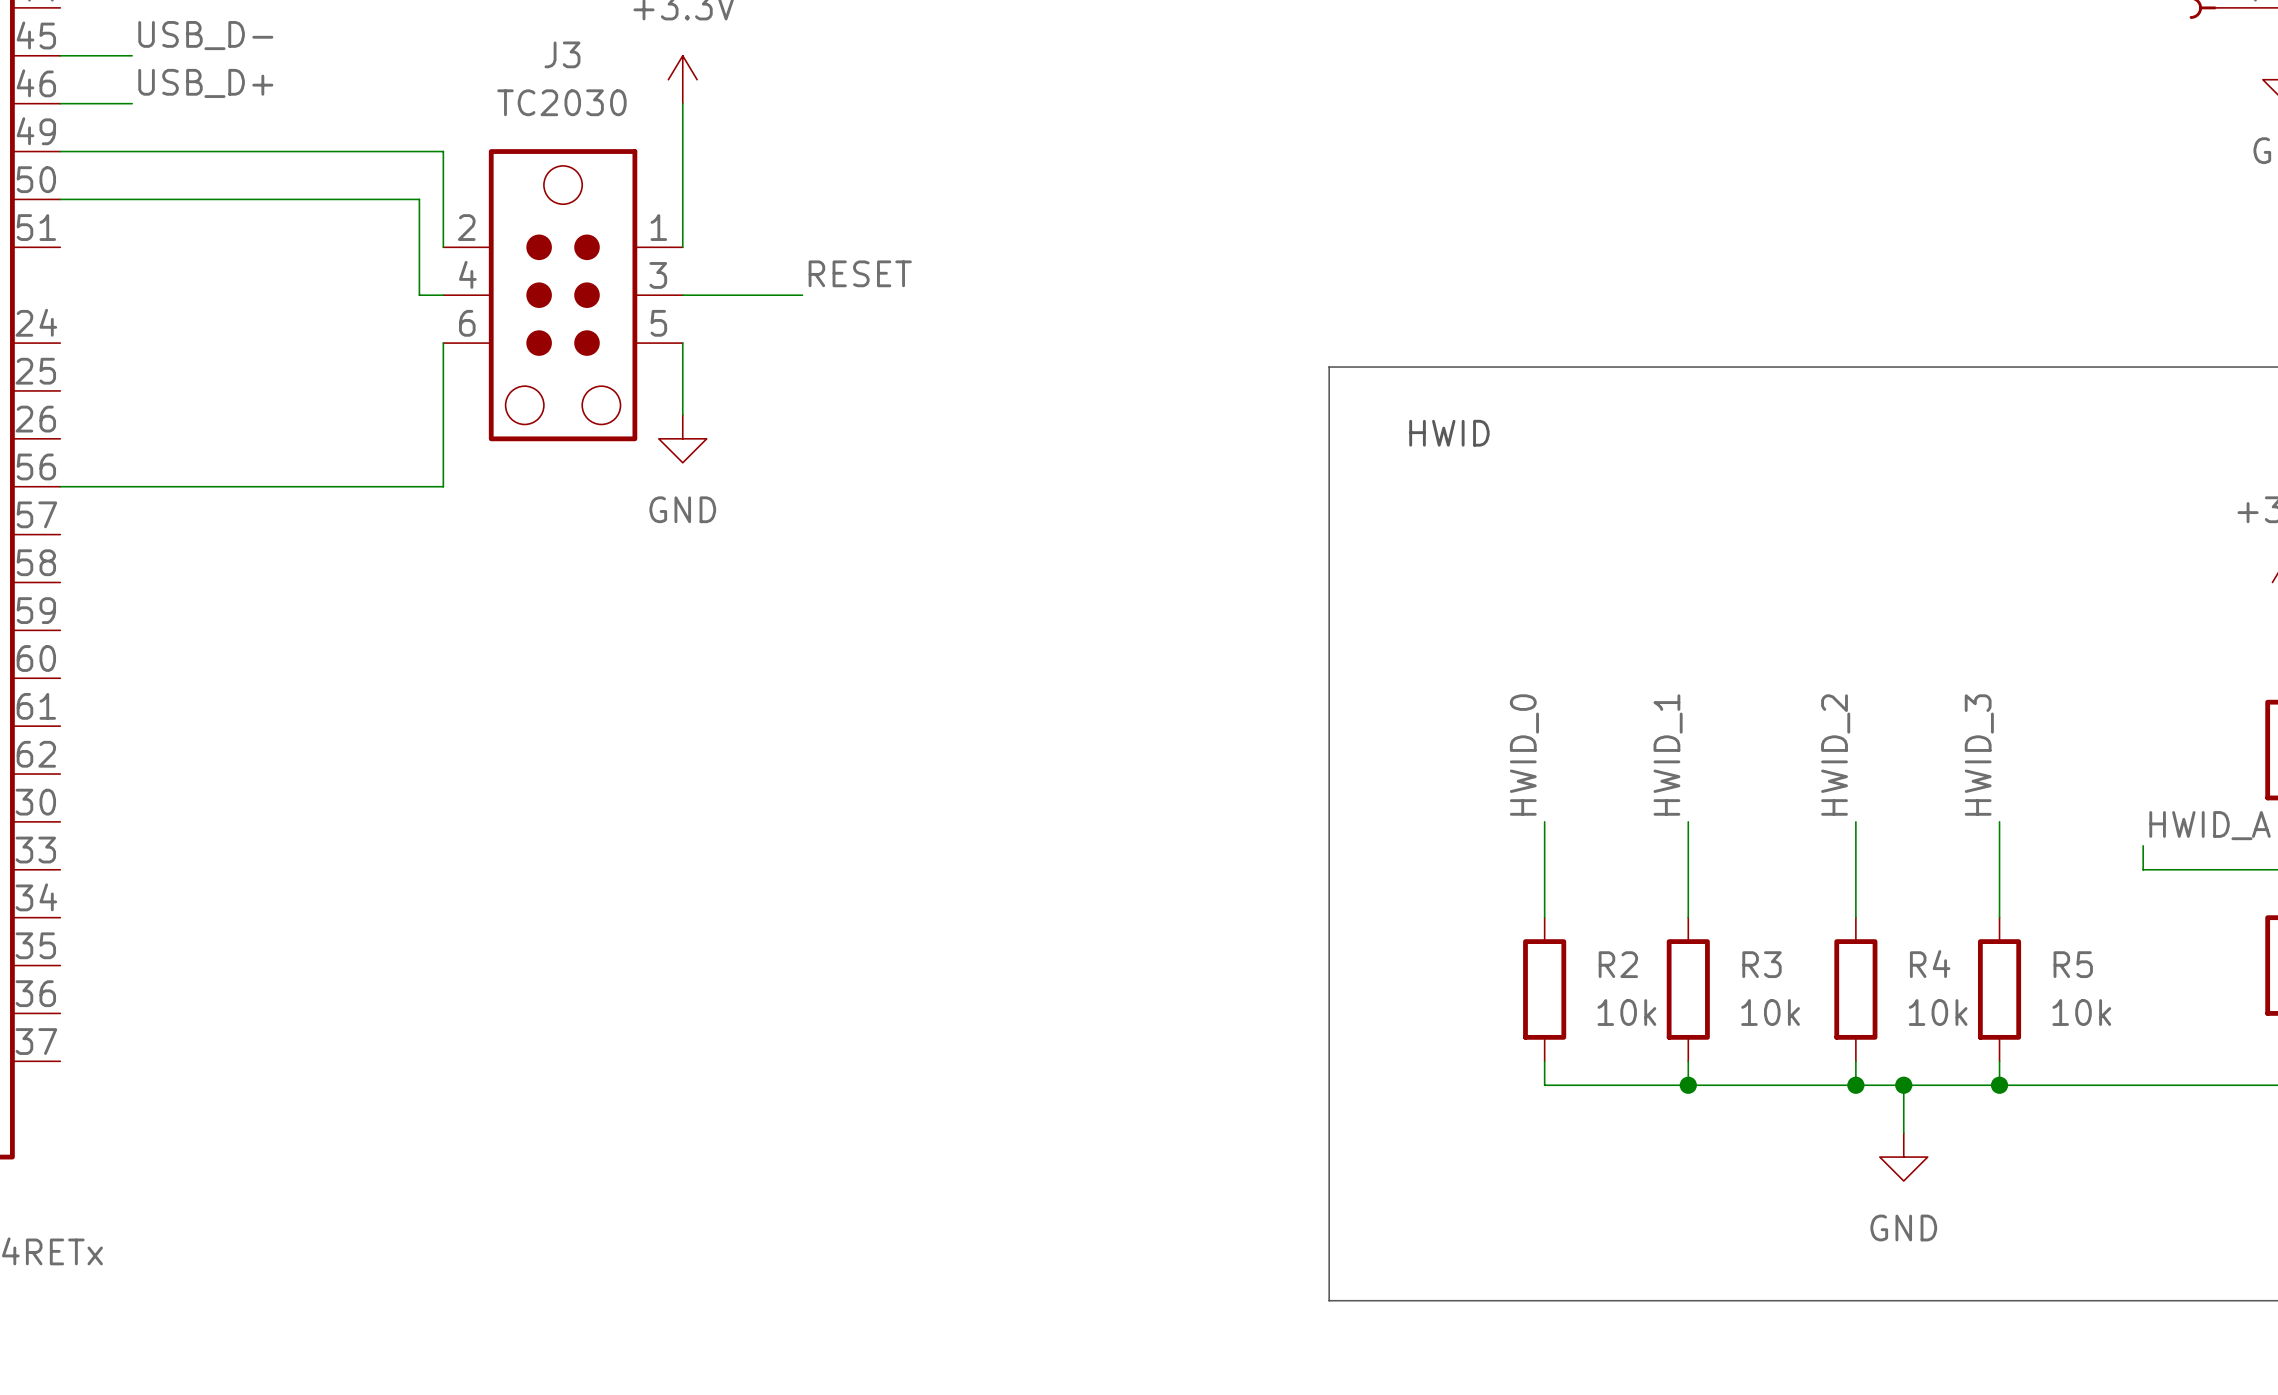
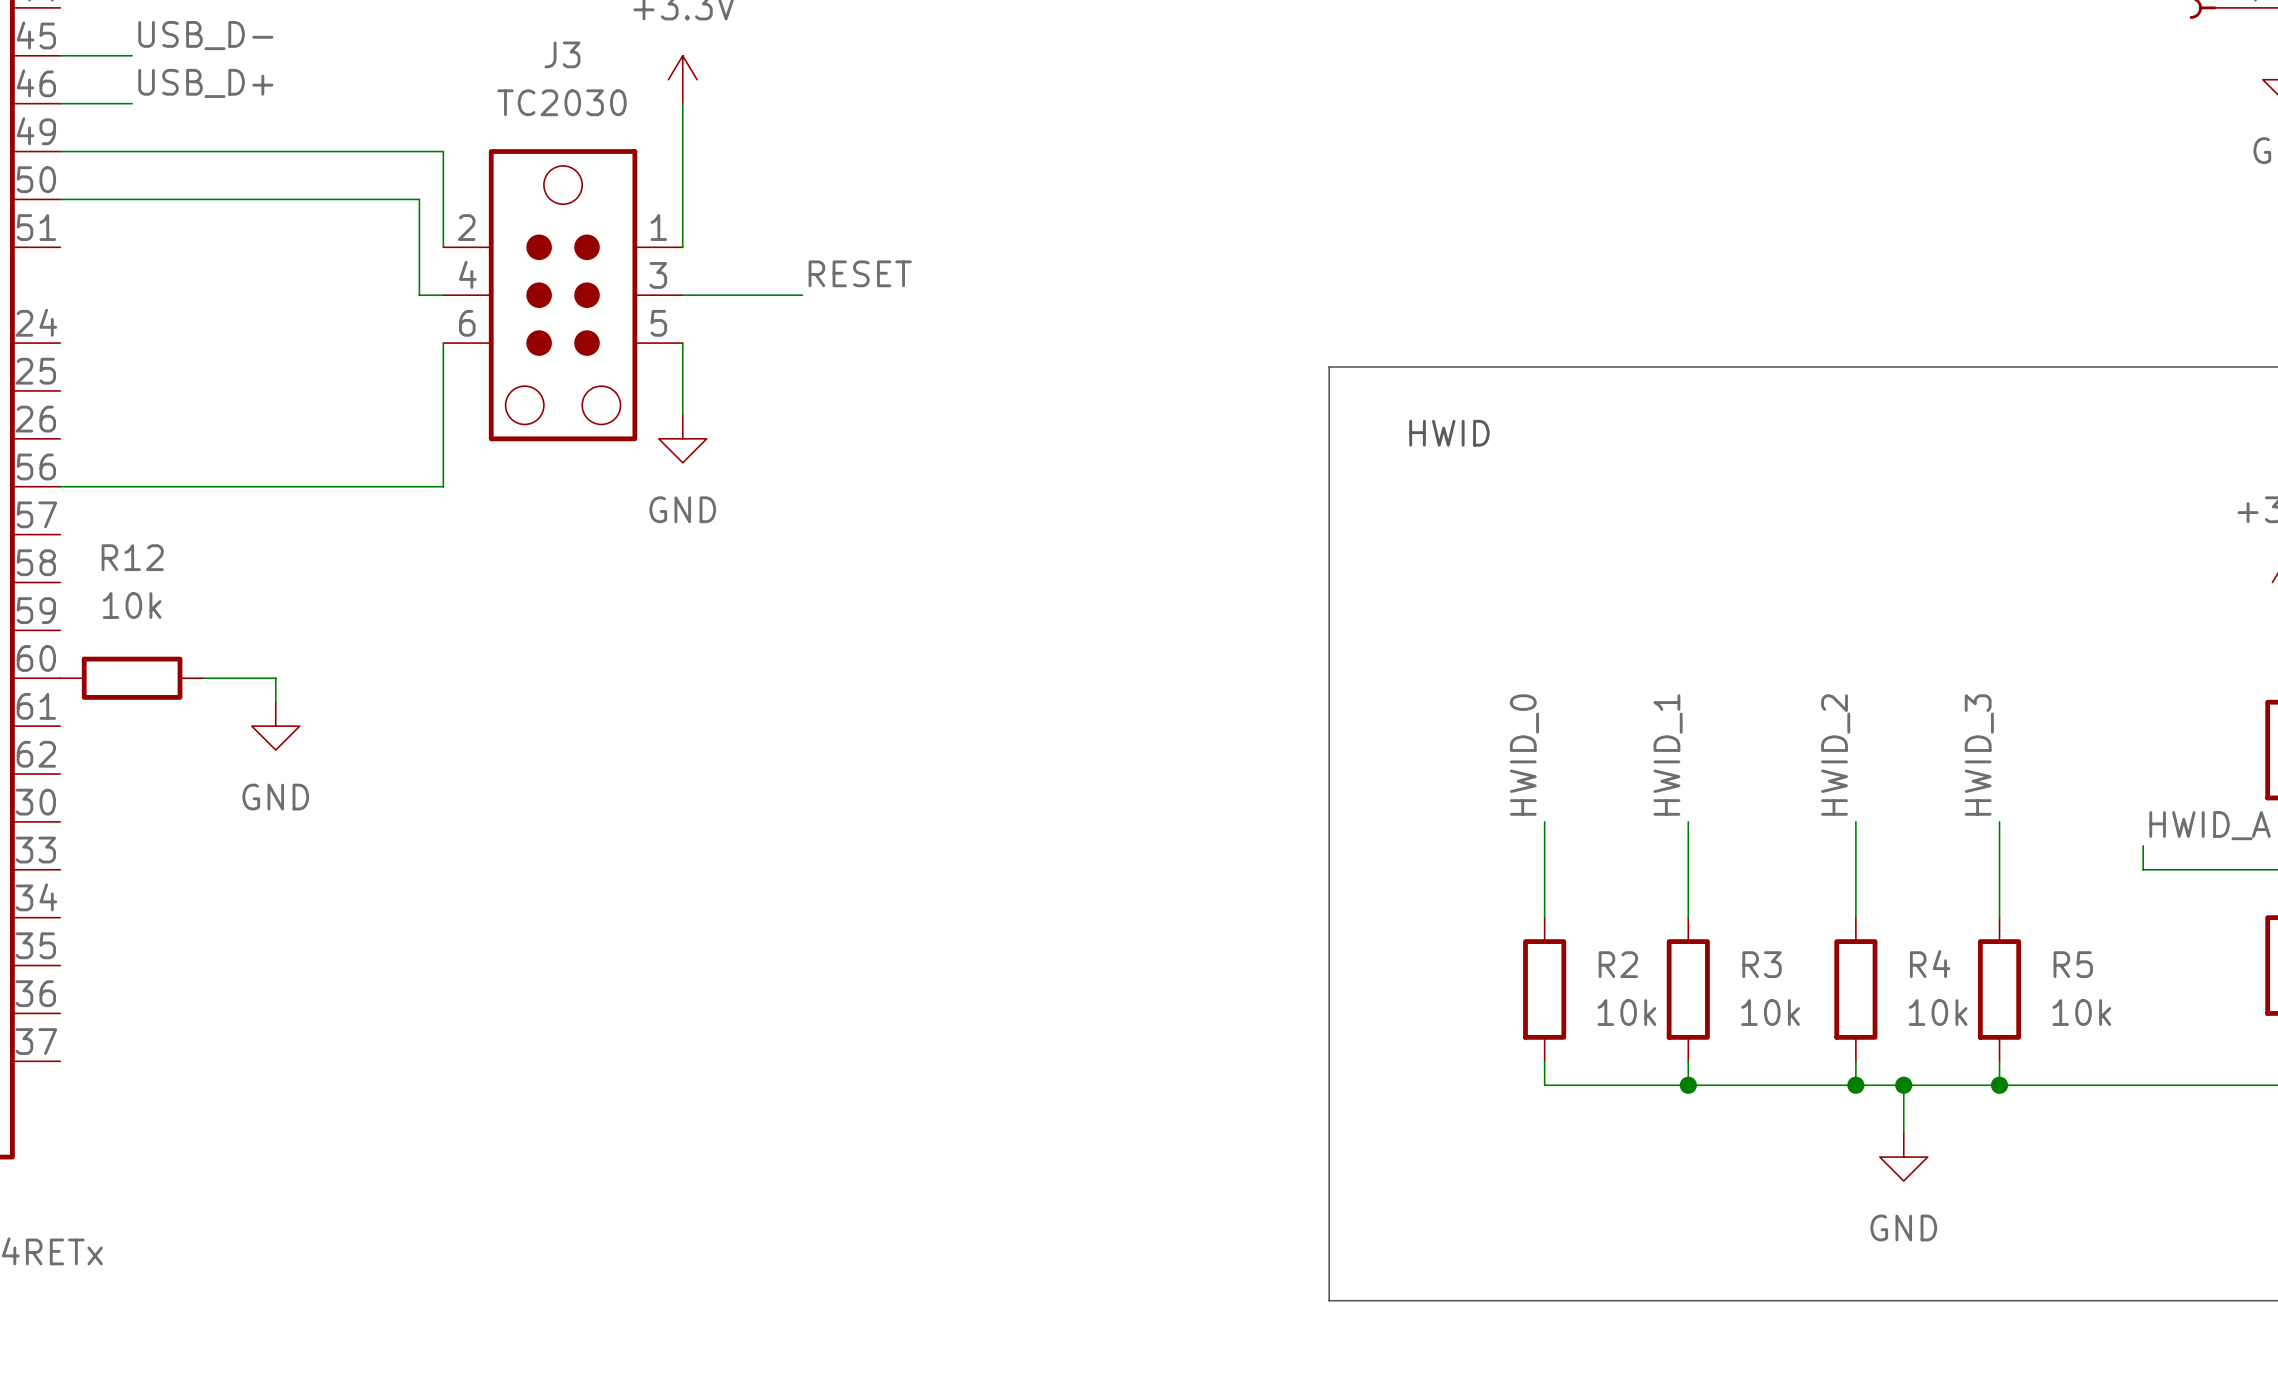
R12: none -> 10k (132, 678)
wire: none -> (203, 678) (275, 678) (275, 702)
power symbol: none -> GND (275, 726)

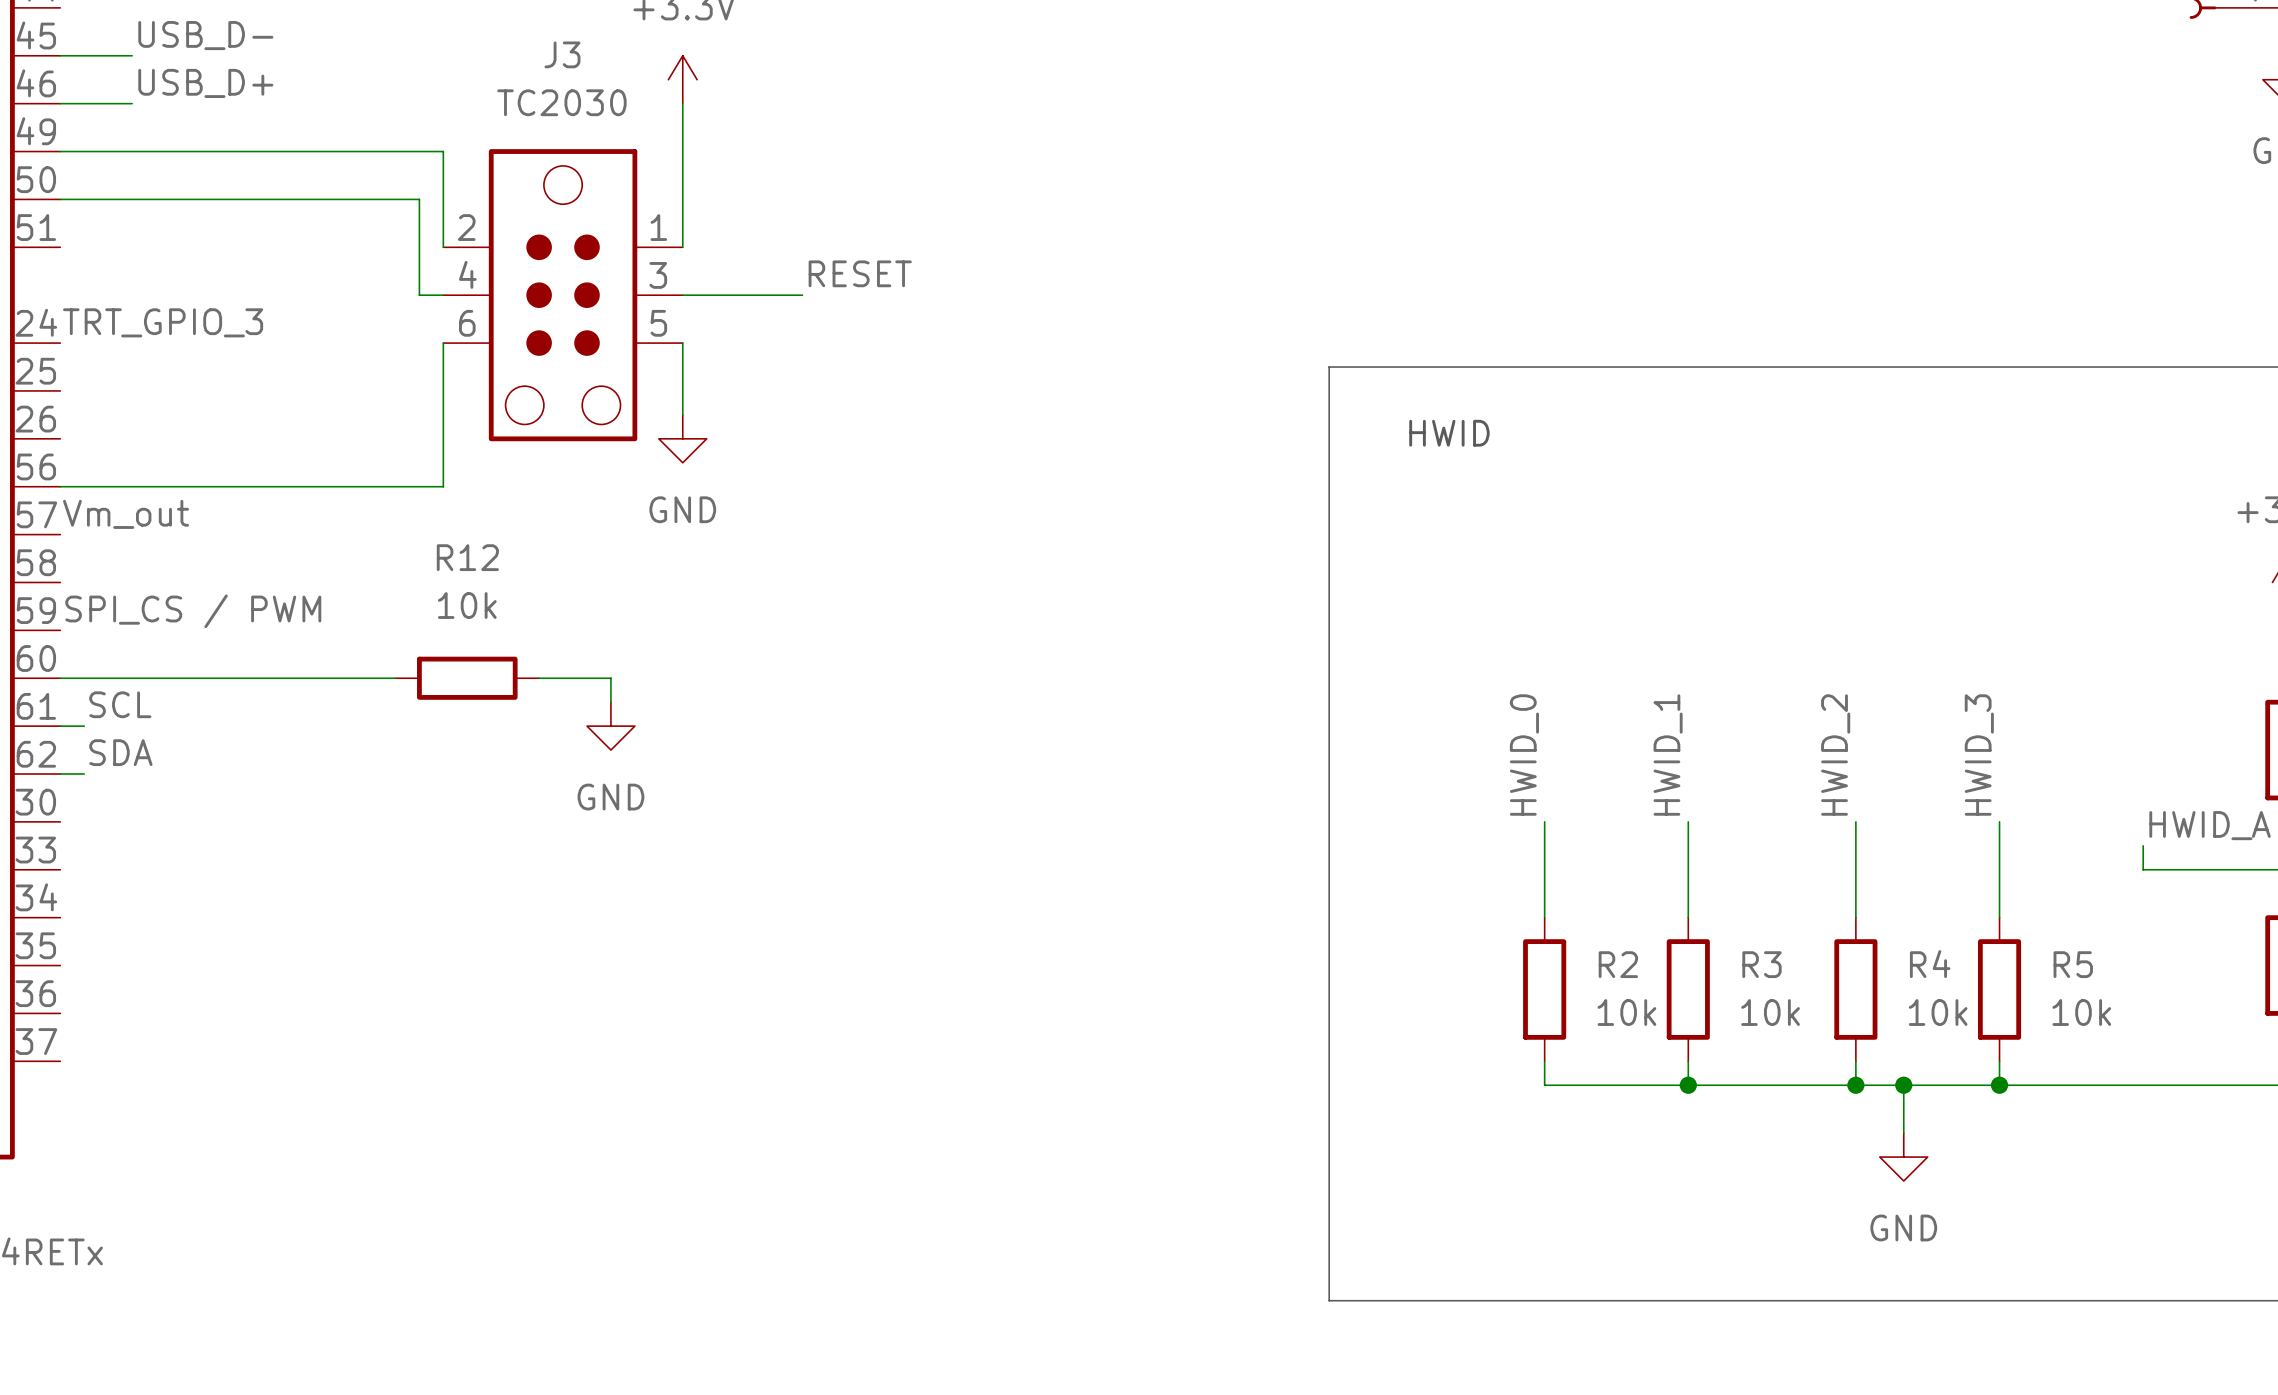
label: none -> TRT_GPIO_3 (163, 322)
label: none -> Vm_out (126, 514)
label: none -> SPI_CS / PWM (193, 611)
wire: none -> (60, 678) (203, 678)
R12 position: (132, 678) -> (467, 678)
wire: (275, 678) (275, 702) -> (275, 678) (395, 678)
wire: none -> (539, 678) (610, 678) (610, 702)
label: none -> SCL (120, 704)
wire: none -> (60, 726) (84, 726)
power symbol position: GND (275, 726) -> GND (610, 726)
label: none -> SDA (120, 752)
wire: none -> (60, 774) (84, 774)

